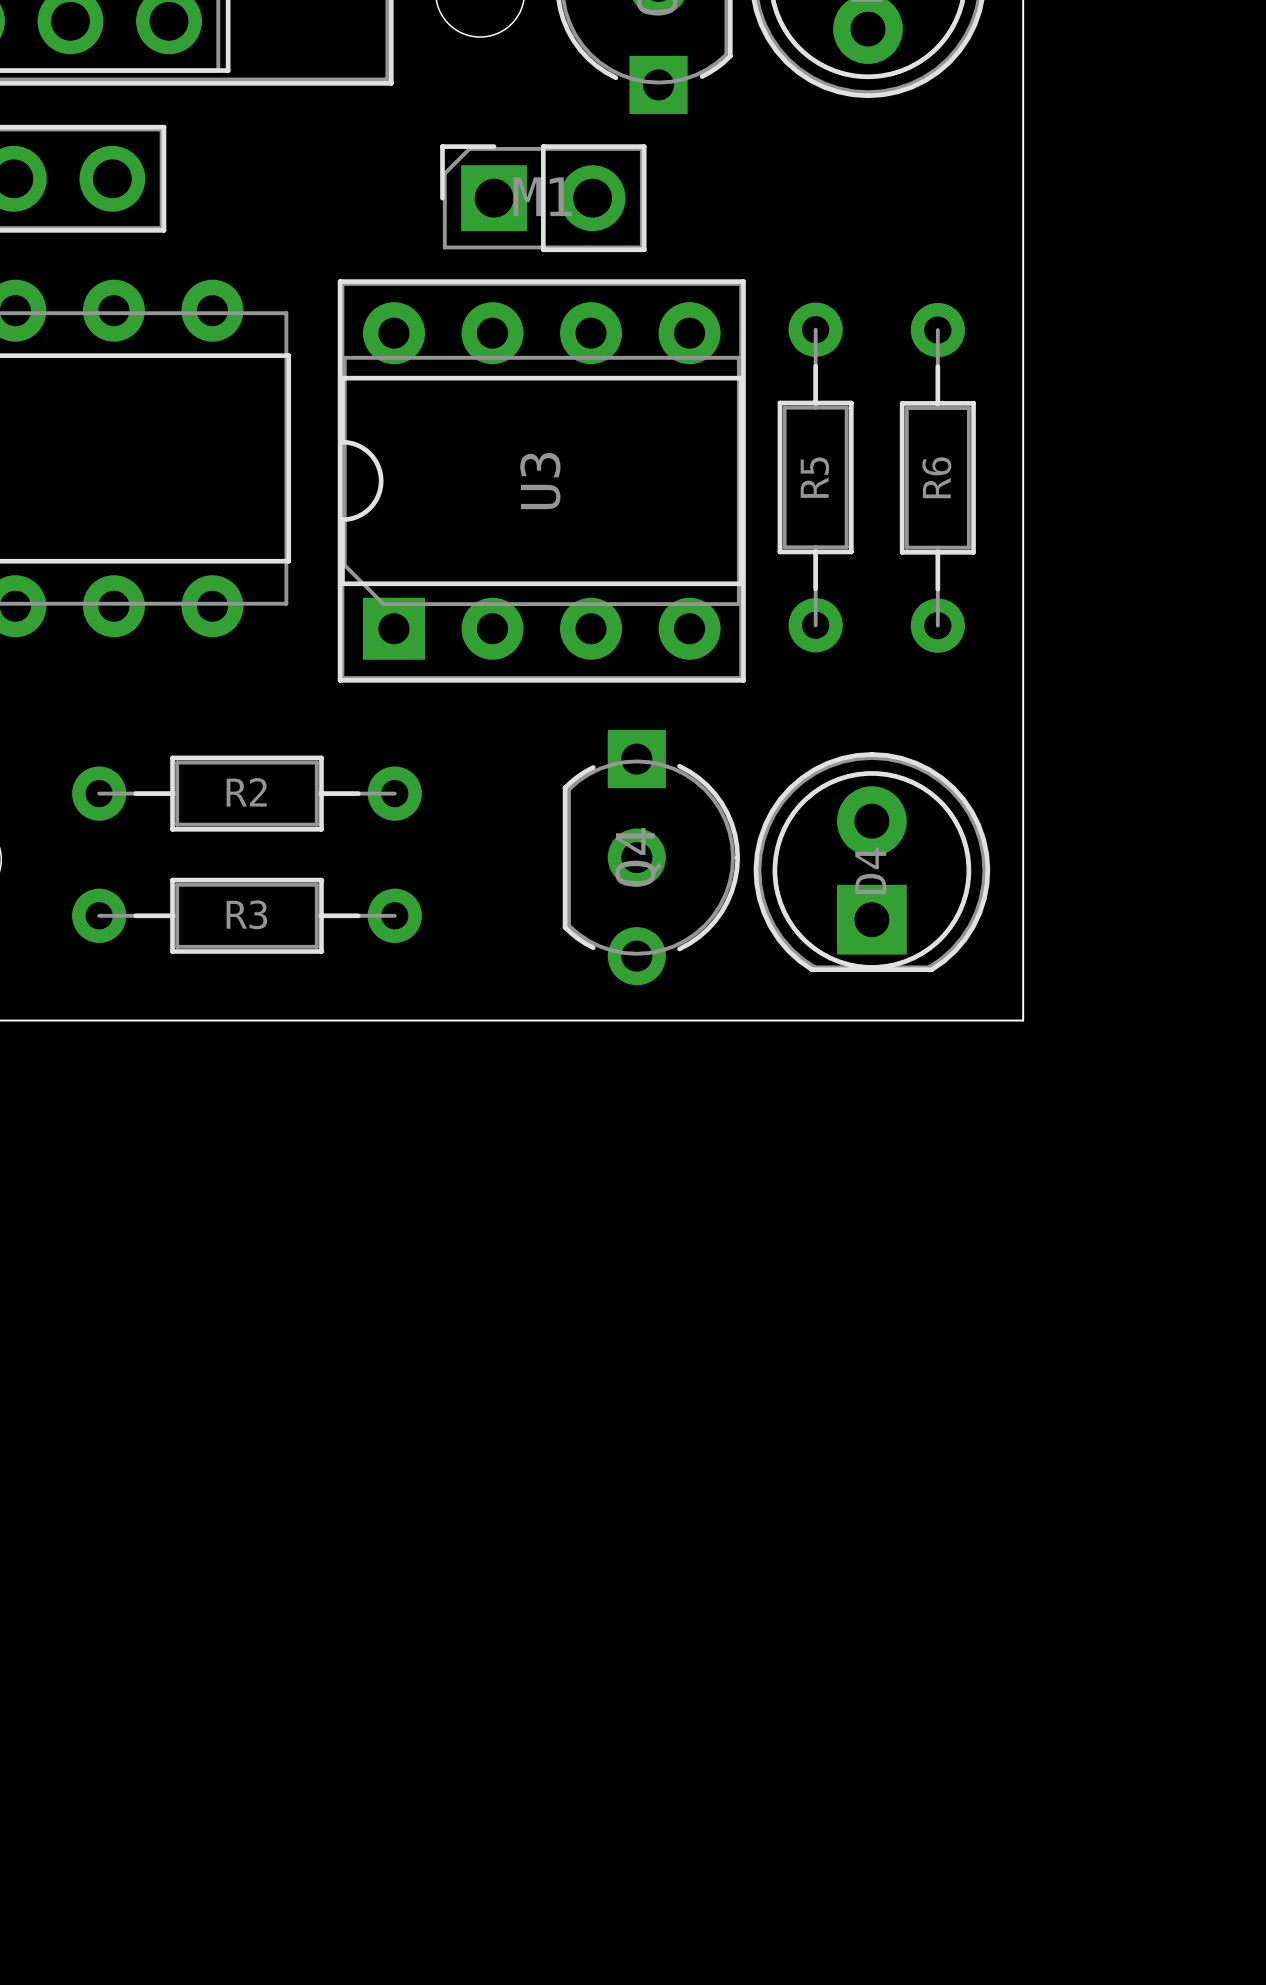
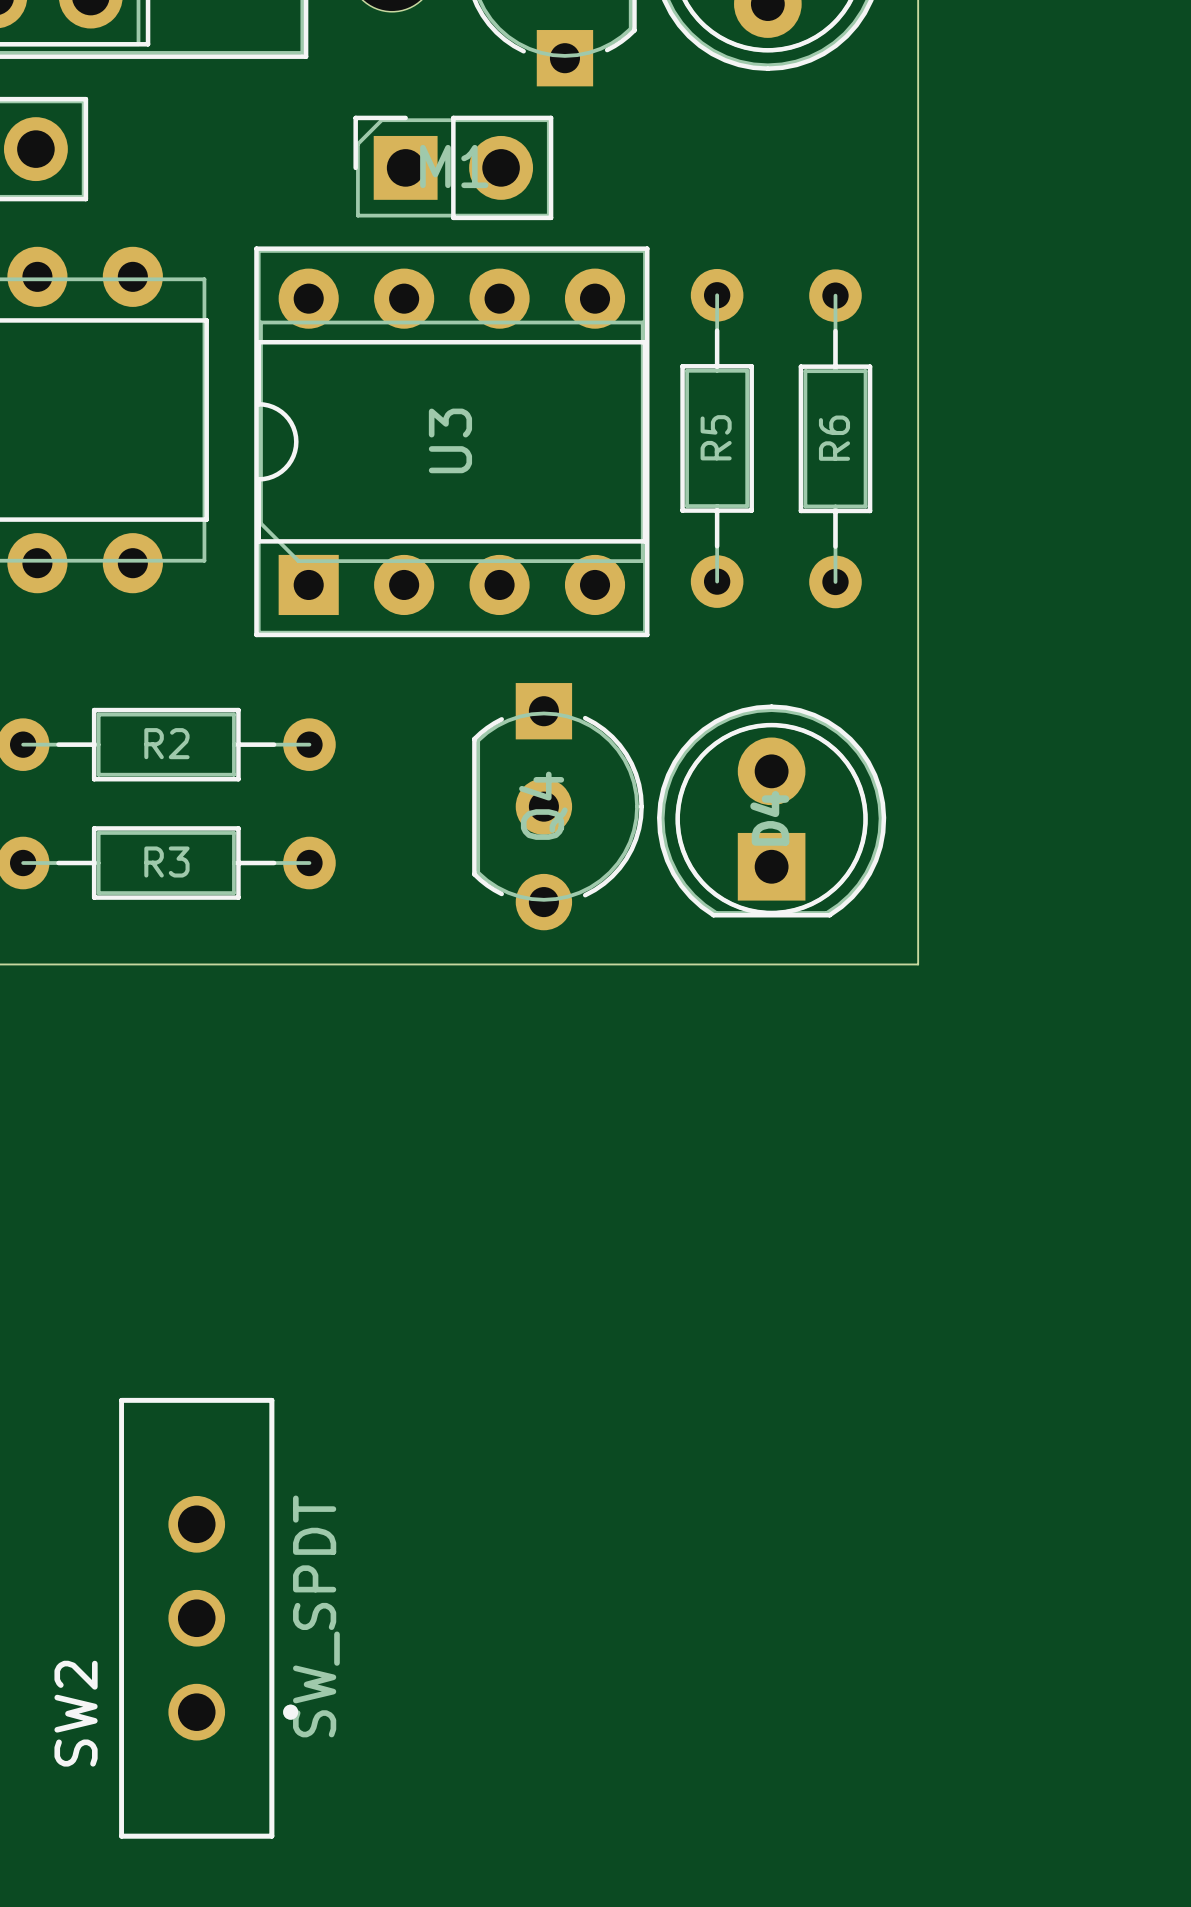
SW2: none -> SW_SPDT (208, 1618)

